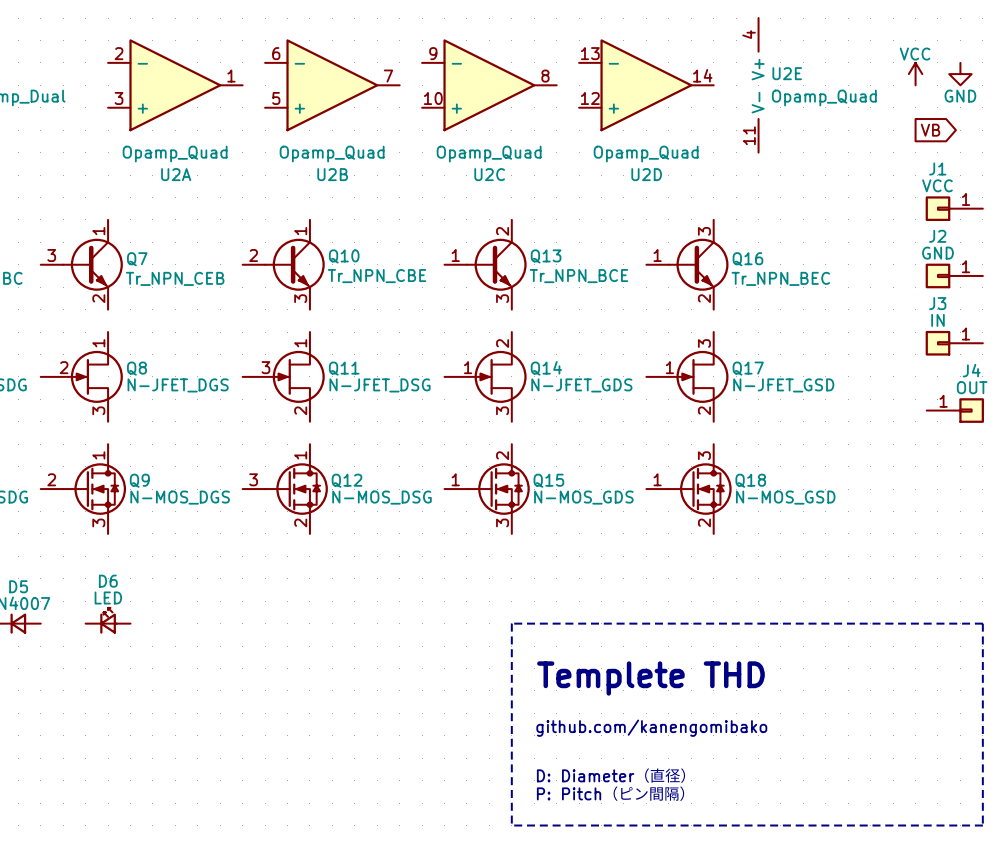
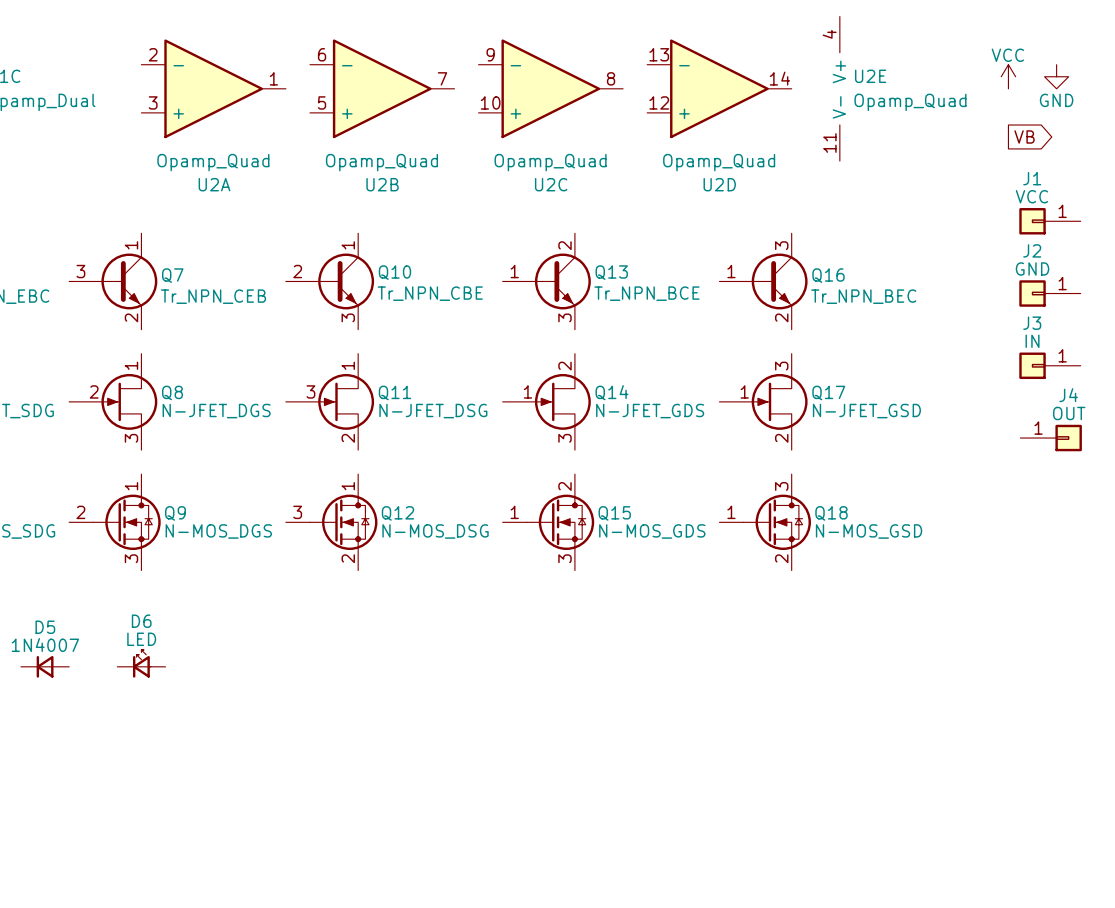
line: (511, 623) (982, 623) (982, 825) (511, 825) (511, 623) -> none
text: Templete THD (650, 678) -> none
text: github.com/kanengomibako (651, 728) -> none
text: D: Diameter（直径） (611, 775) -> none
text: P: Pitch（ピン間隔） (610, 793) -> none

